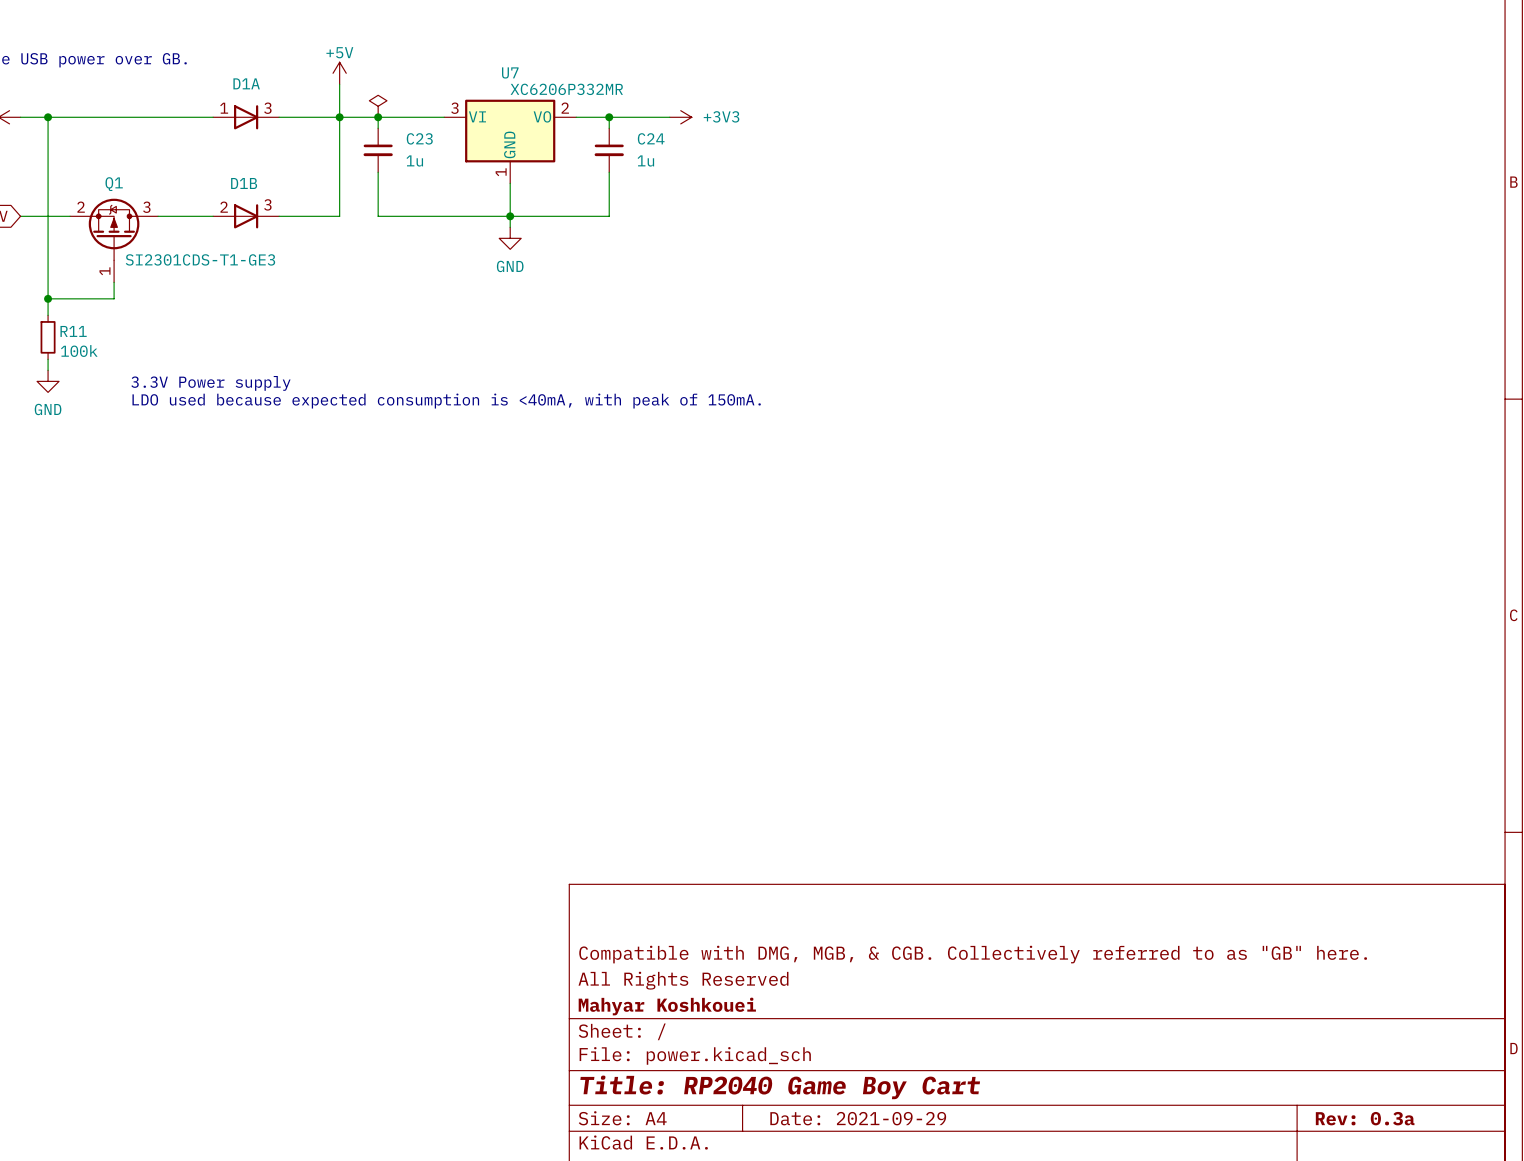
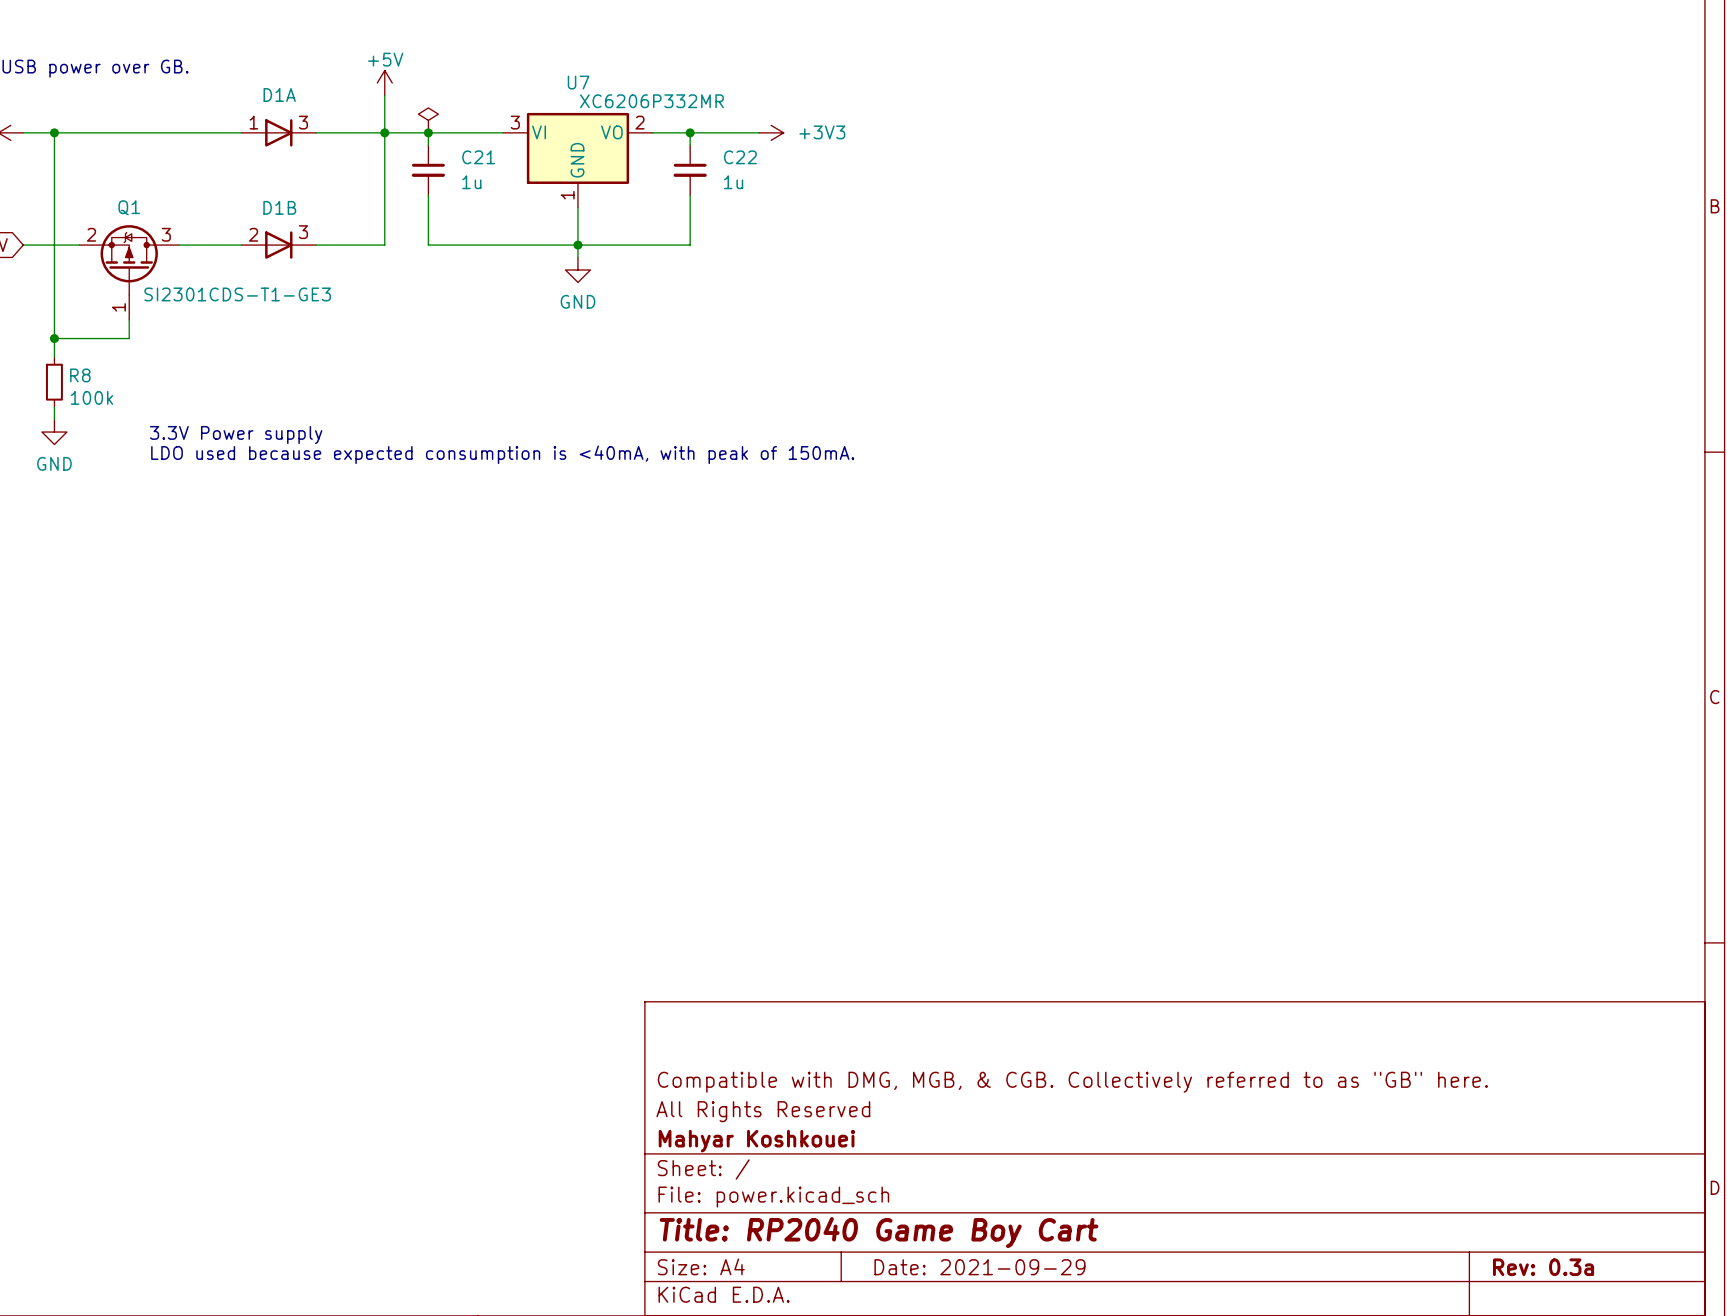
C23 name: C23 (419, 138) -> C21 (478, 157)
C24 name: C24 (651, 138) -> C22 (740, 157)
R11 name: R11 (73, 331) -> R8 (80, 375)

